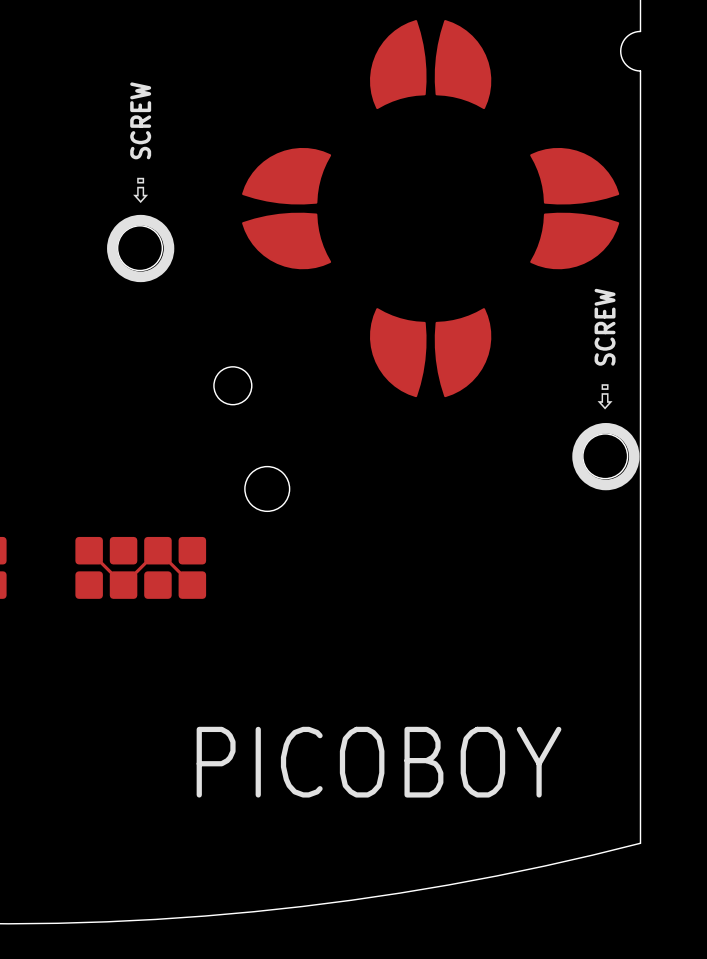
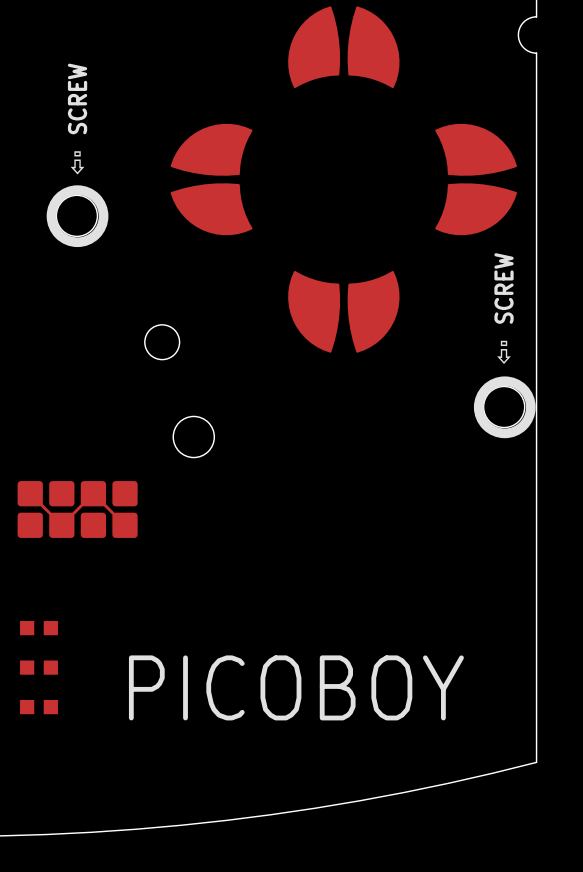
part: none -> (38, 628)
part: none -> (38, 667)
part: none -> (38, 707)

